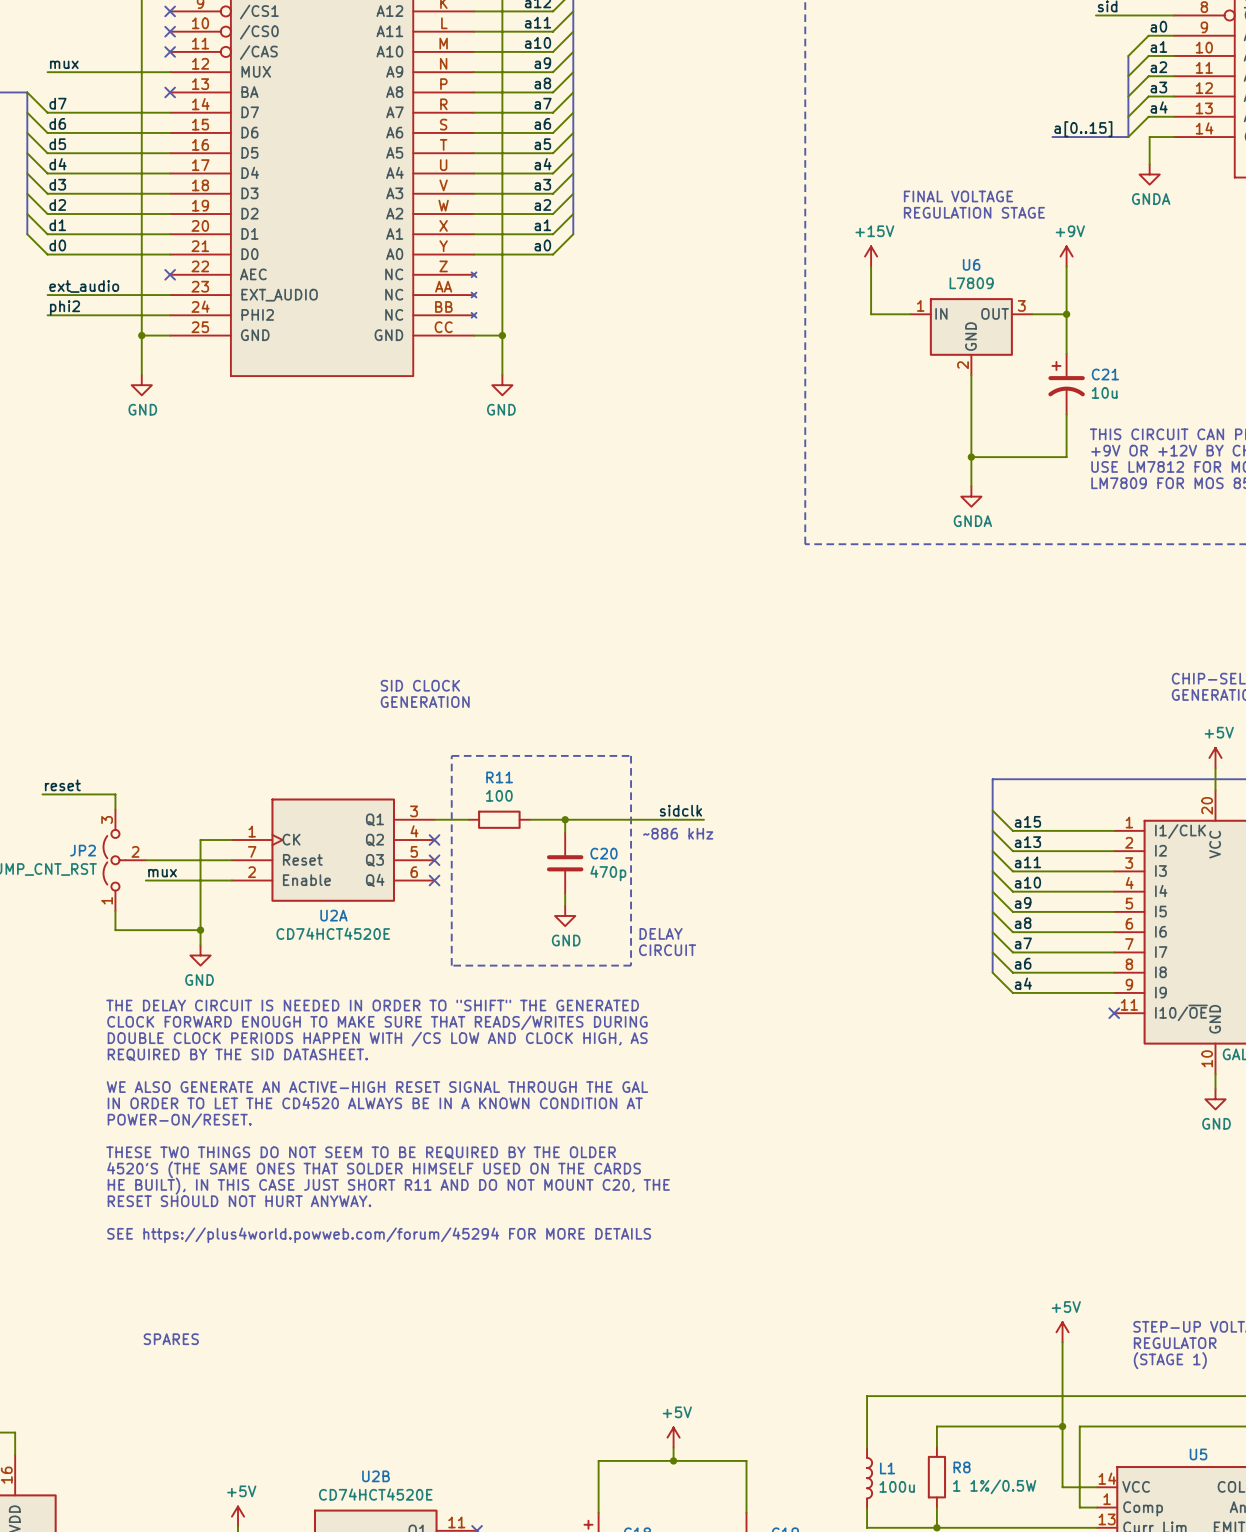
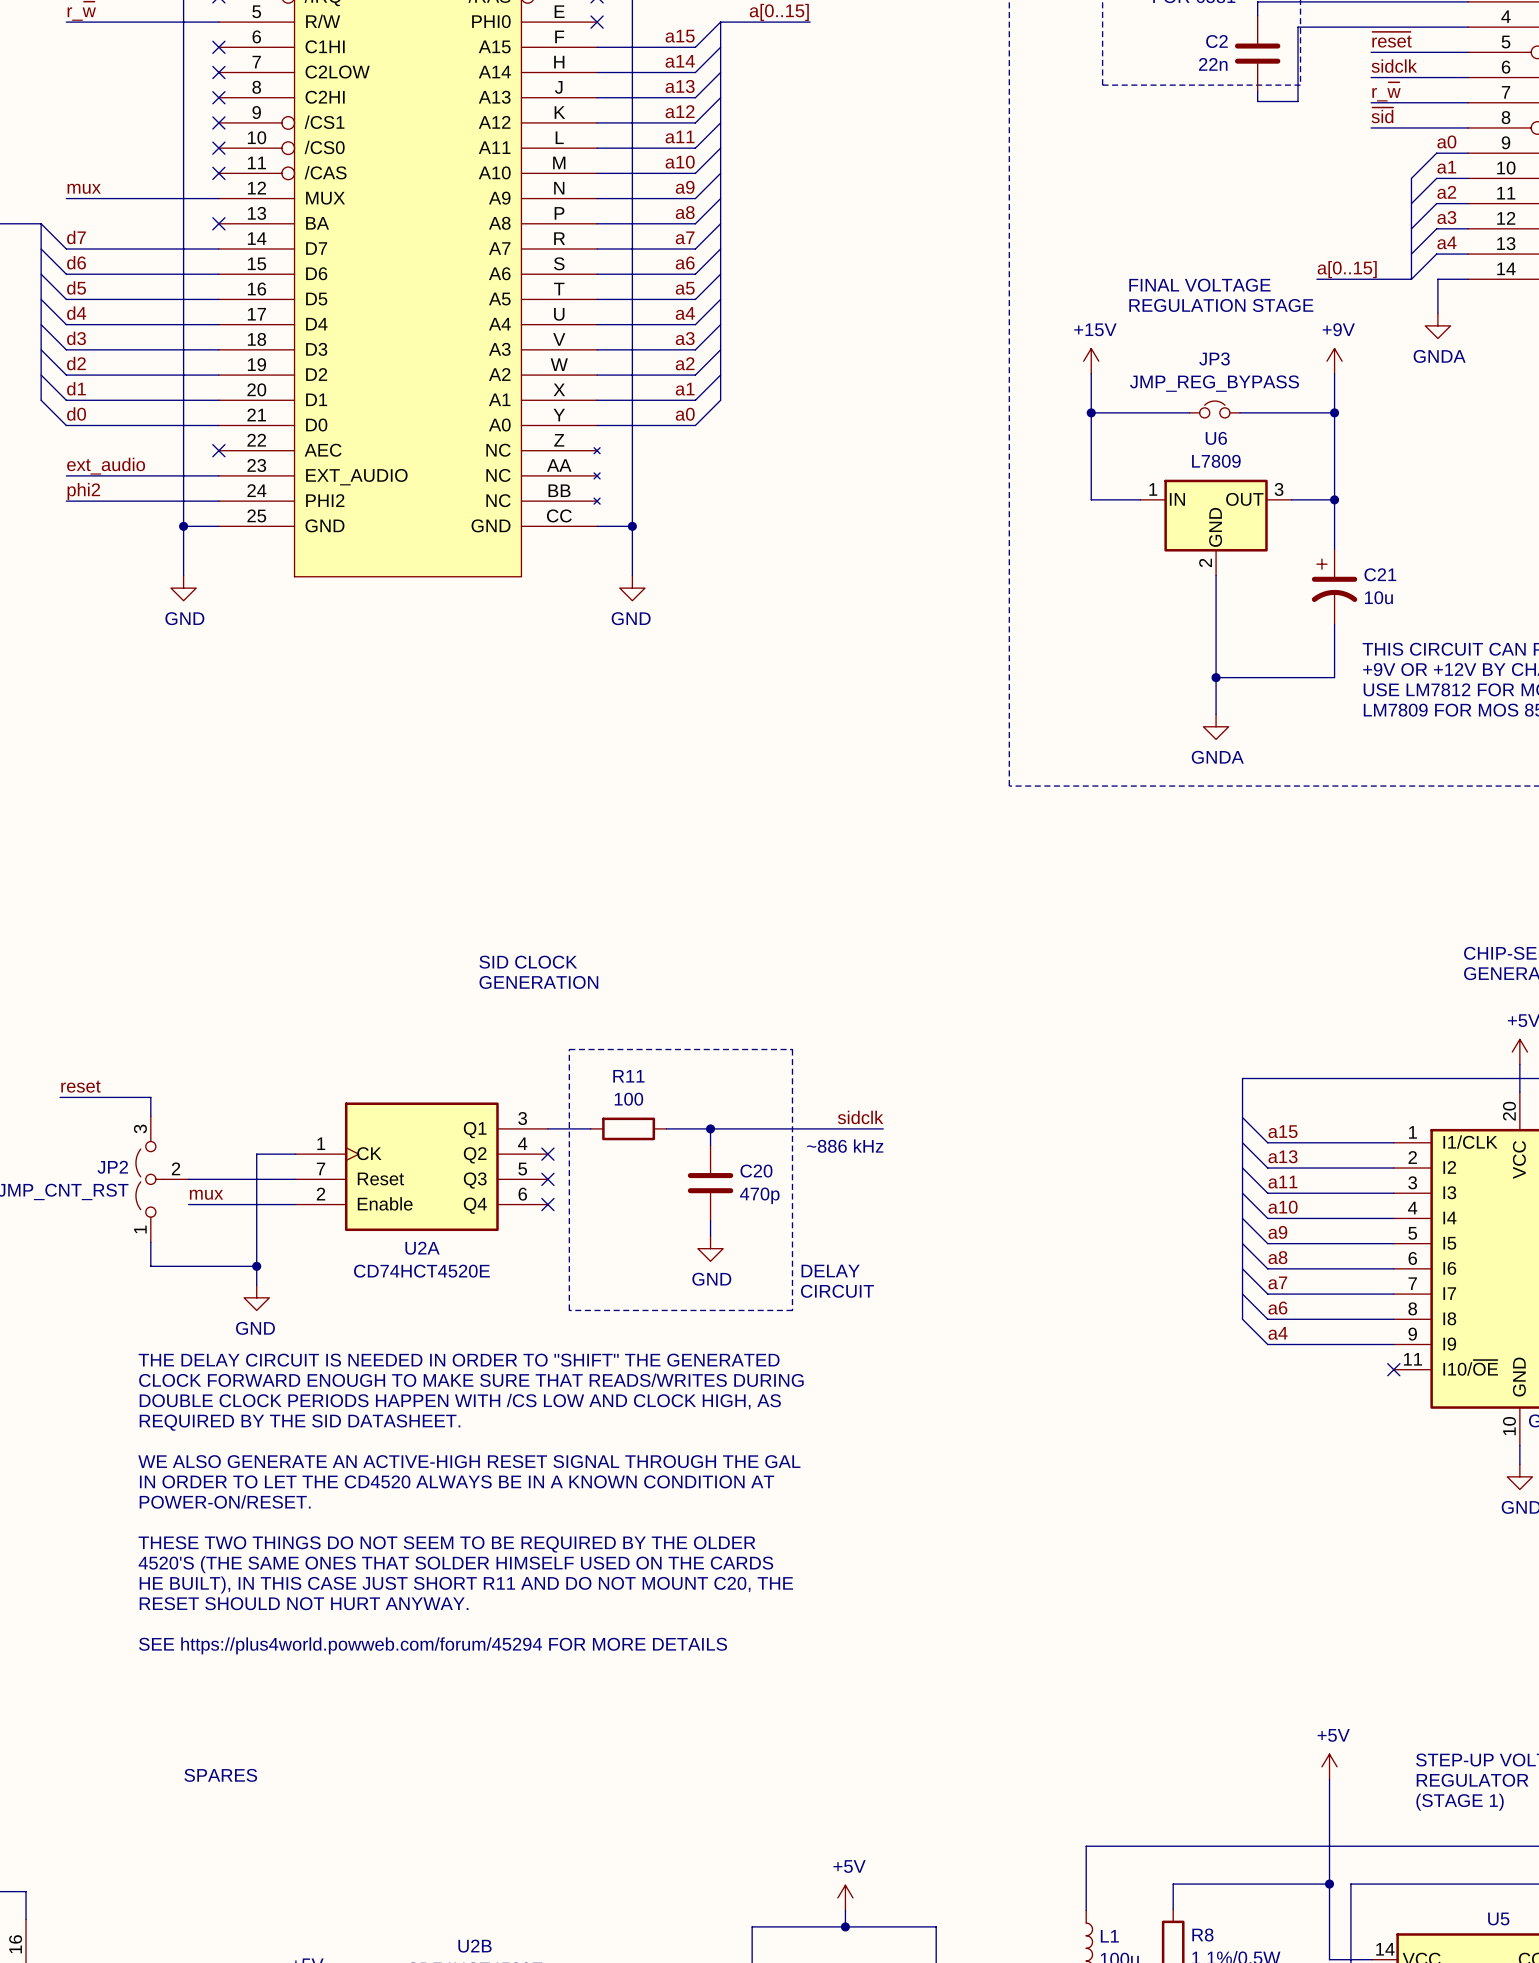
text position: FINAL VOLTAGE (958, 196) -> FINAL VOLTAGE (1199, 285)
wire: none -> (1091, 373) (1091, 440)
text position: REGULATION STAGE (974, 212) -> REGULATION STAGE (1221, 305)
wire: none -> (1334, 373) (1334, 440)
JP3: none -> JMP_REG_BYPASS (1214, 409)
wire: none -> (1091, 412) (1189, 412)
junction: none -> (1091, 412)
wire: none -> (1240, 412) (1334, 412)
junction: none -> (1334, 412)
power symbol position: +15V (871, 256) -> +15V (1091, 361)
power symbol position: +9V (1066, 256) -> +9V (1334, 361)

